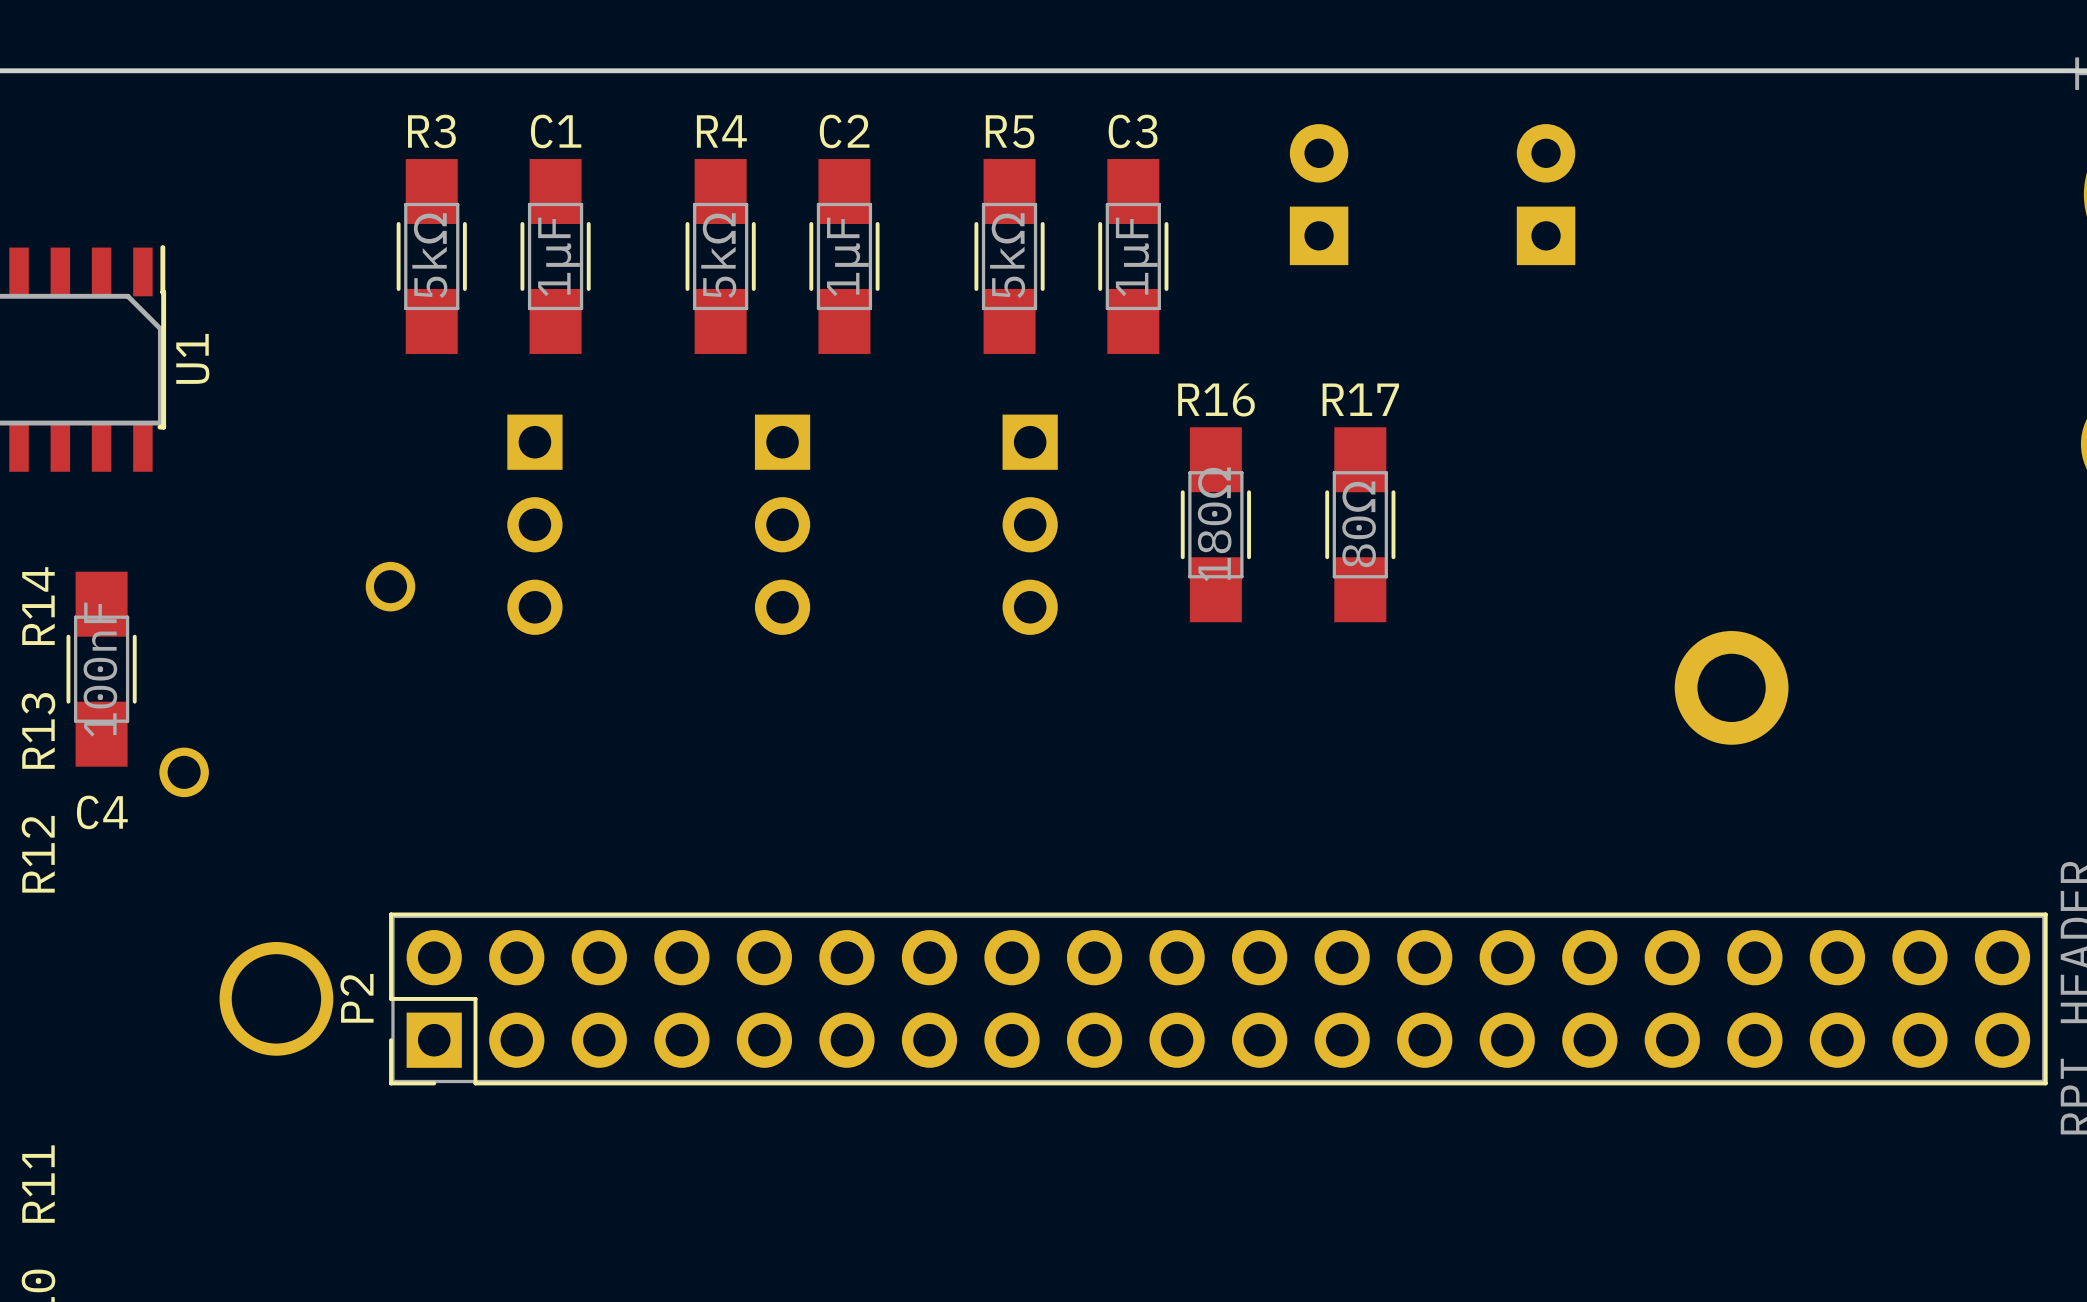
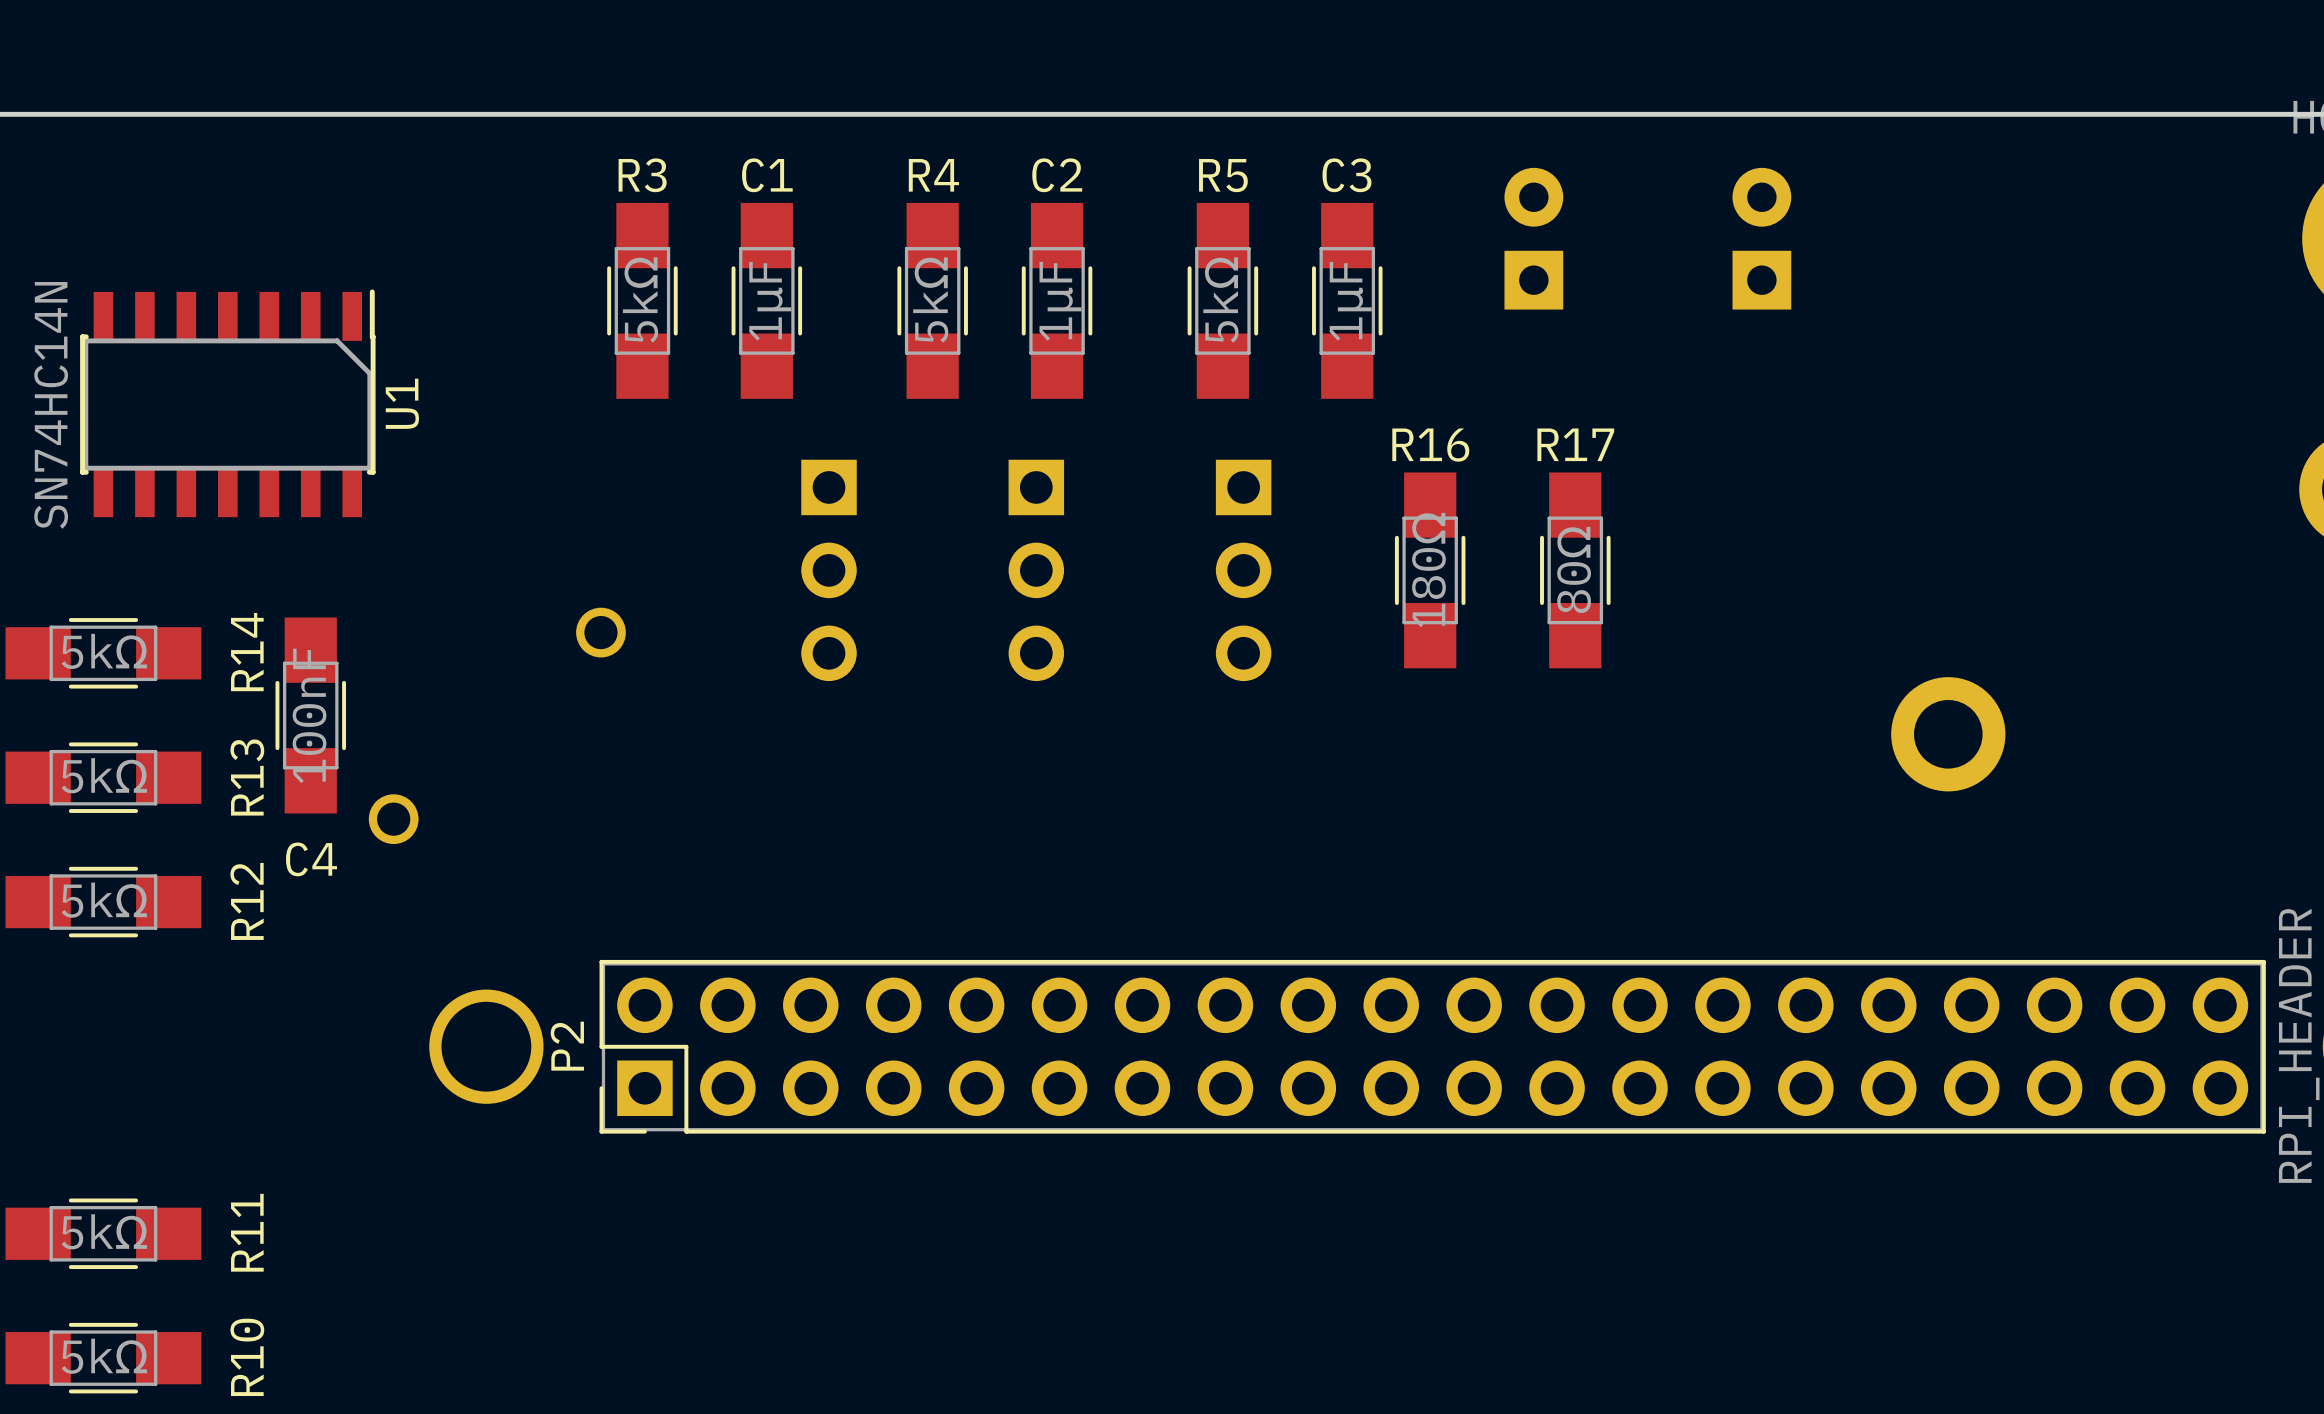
part: (534, 524) -> none
part: none -> (829, 570)
part position: (782, 524) -> (1036, 570)

